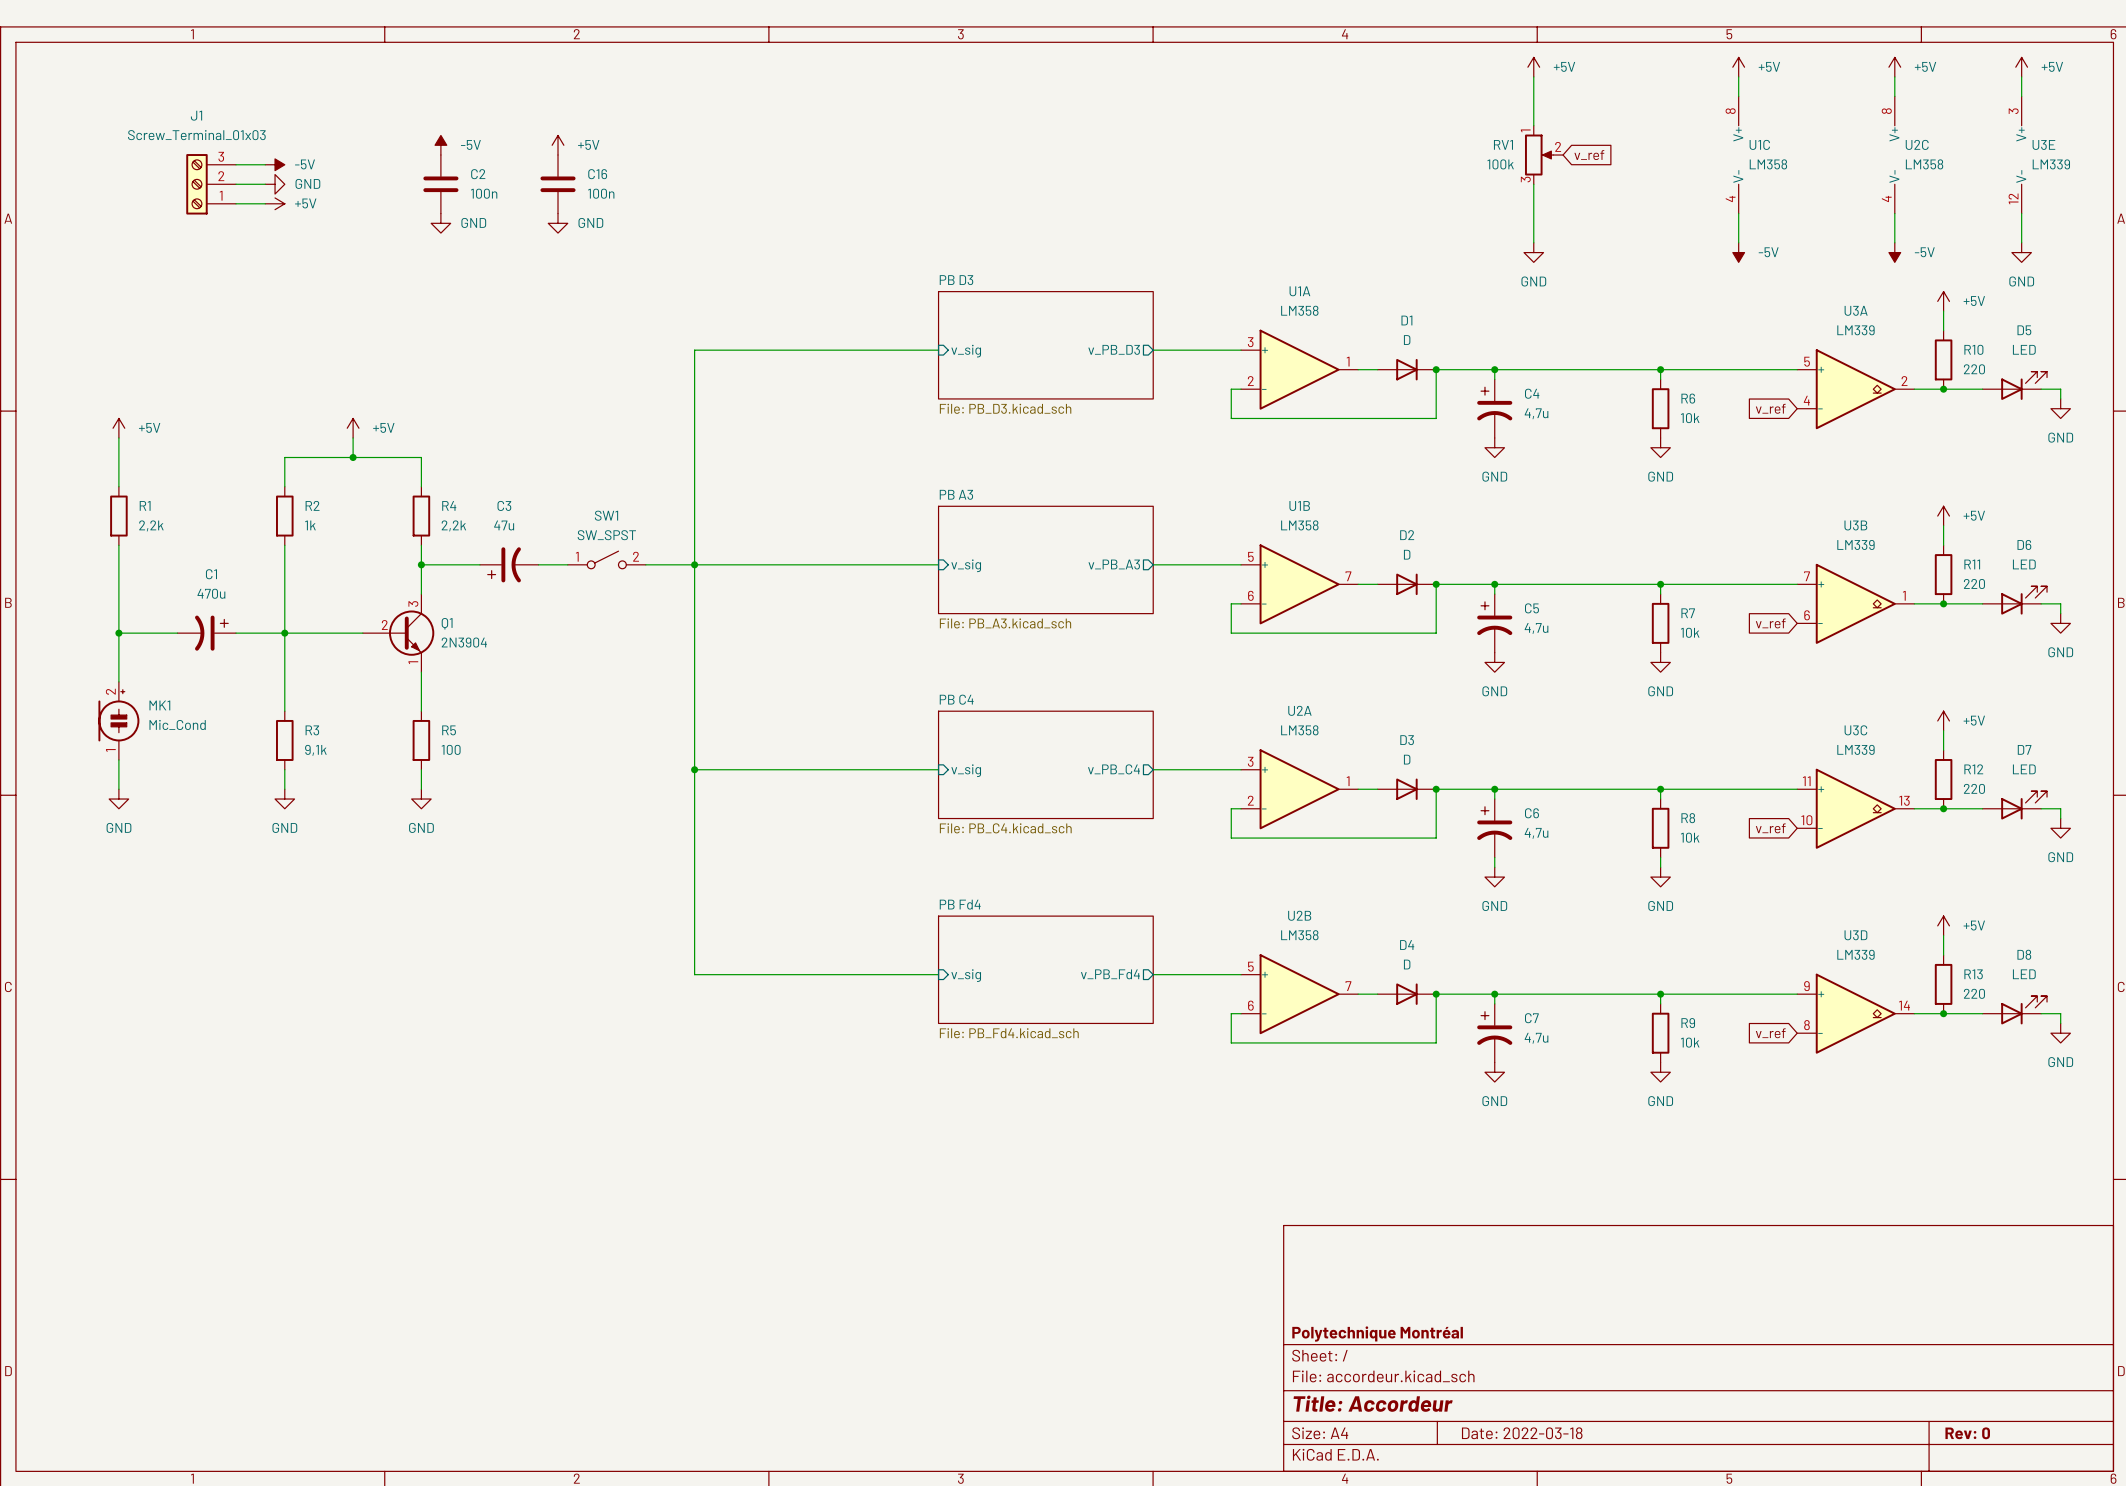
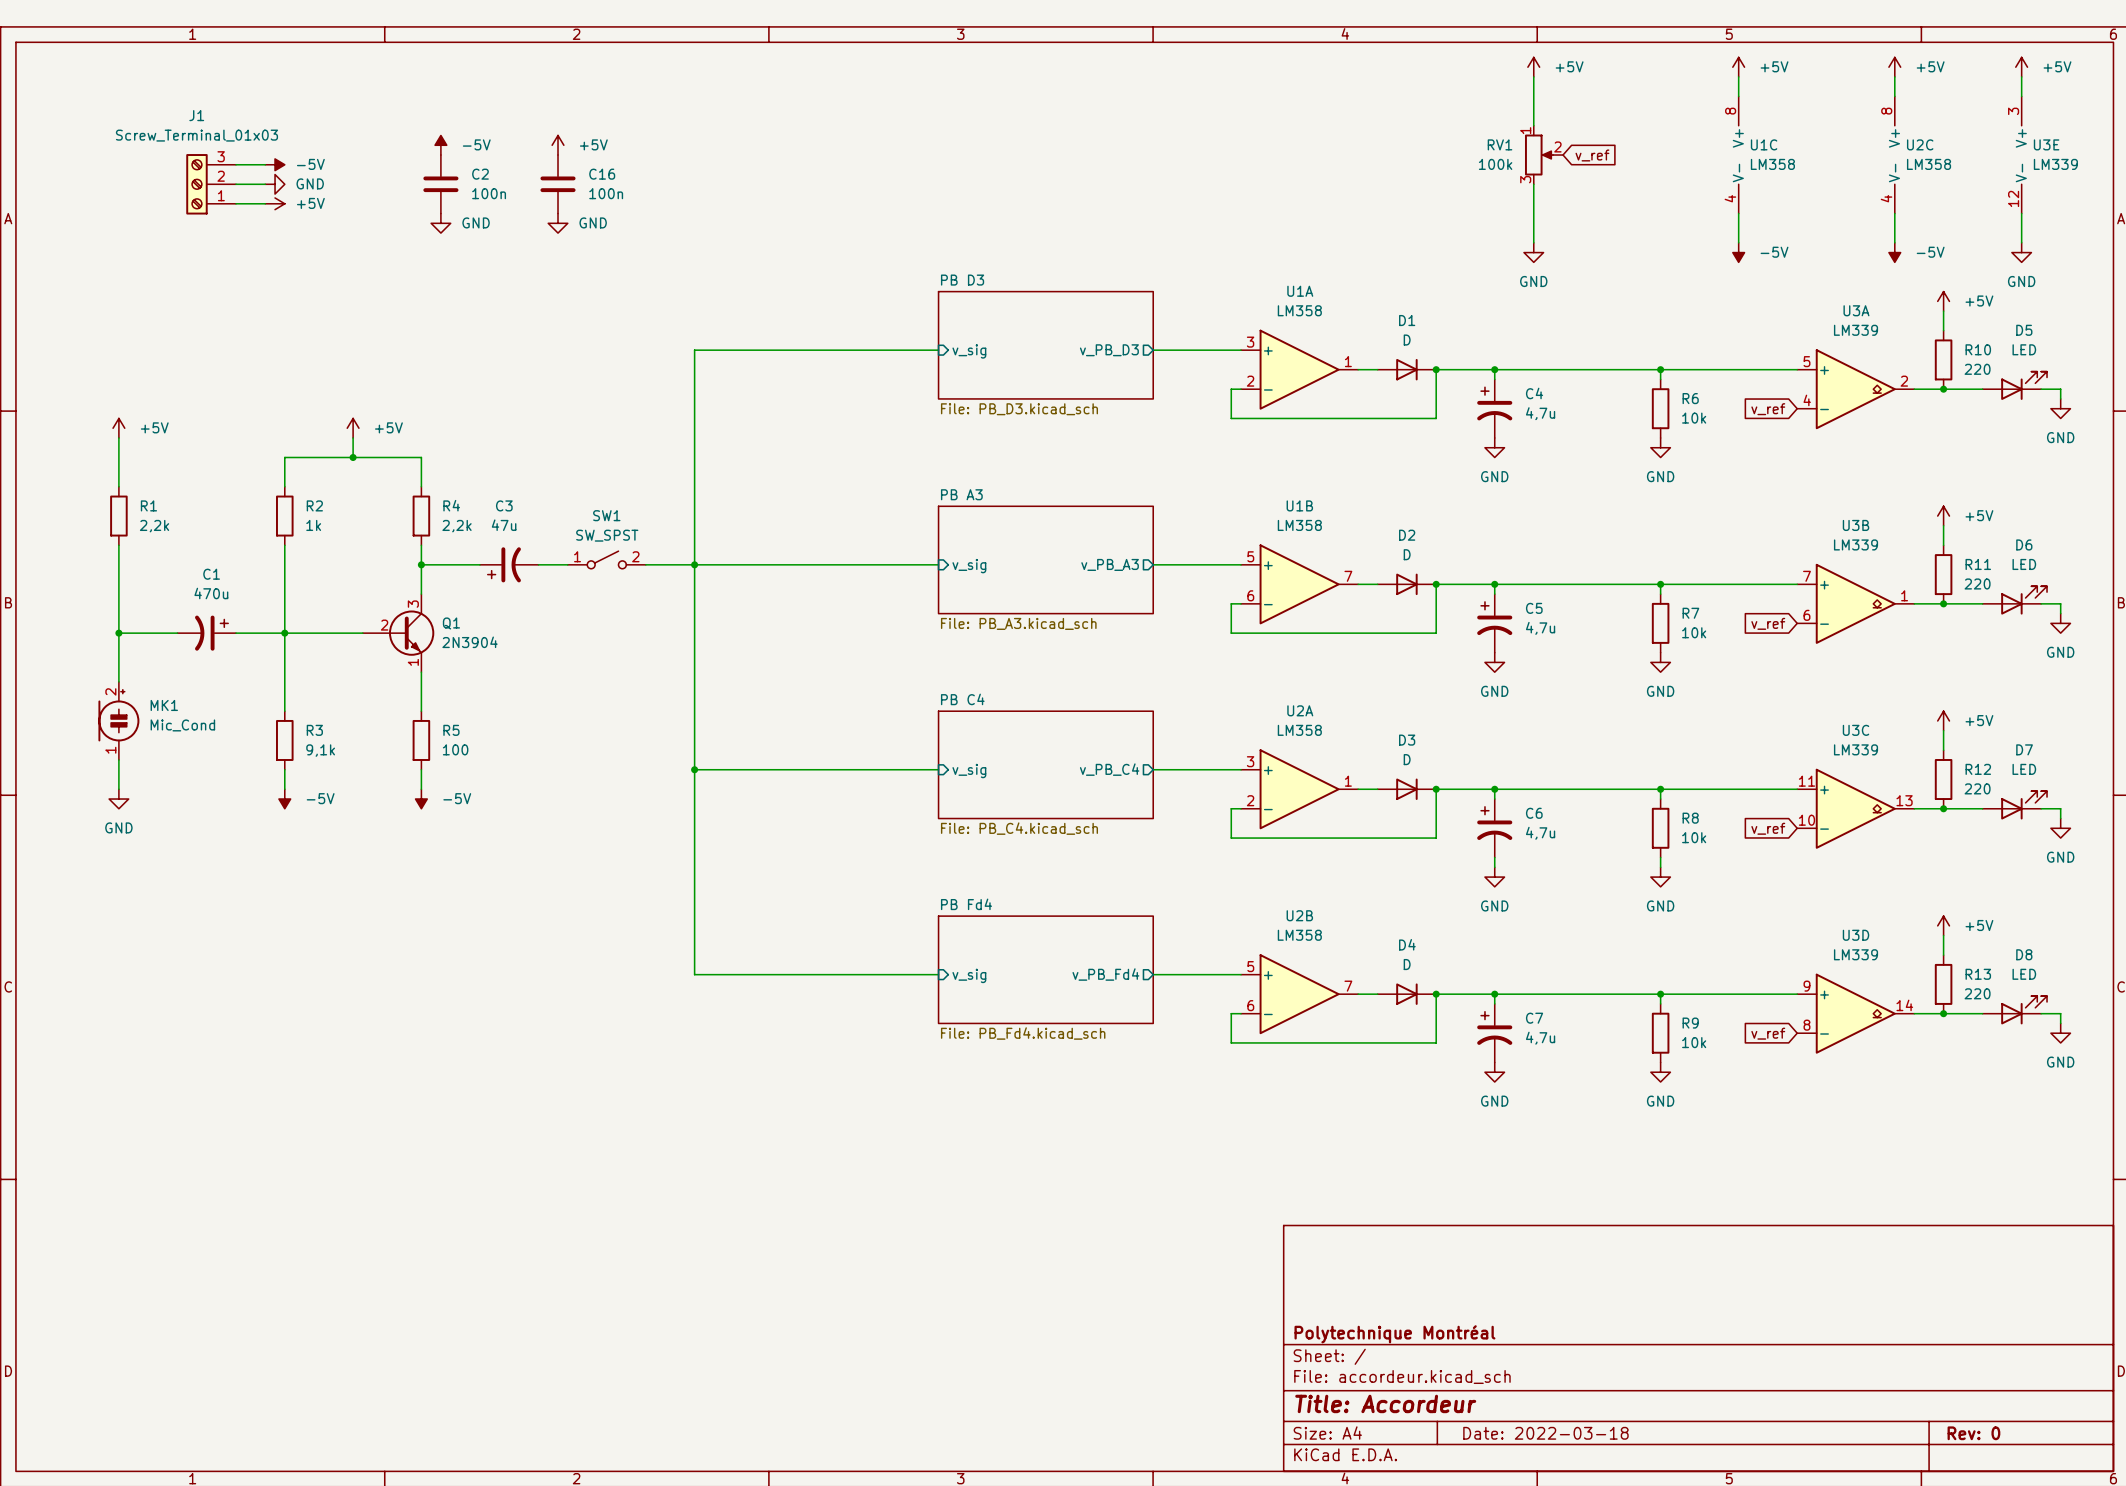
power symbol: GND (284, 799) -> -5V (284, 799)
power symbol: GND (421, 799) -> -5V (421, 799)

